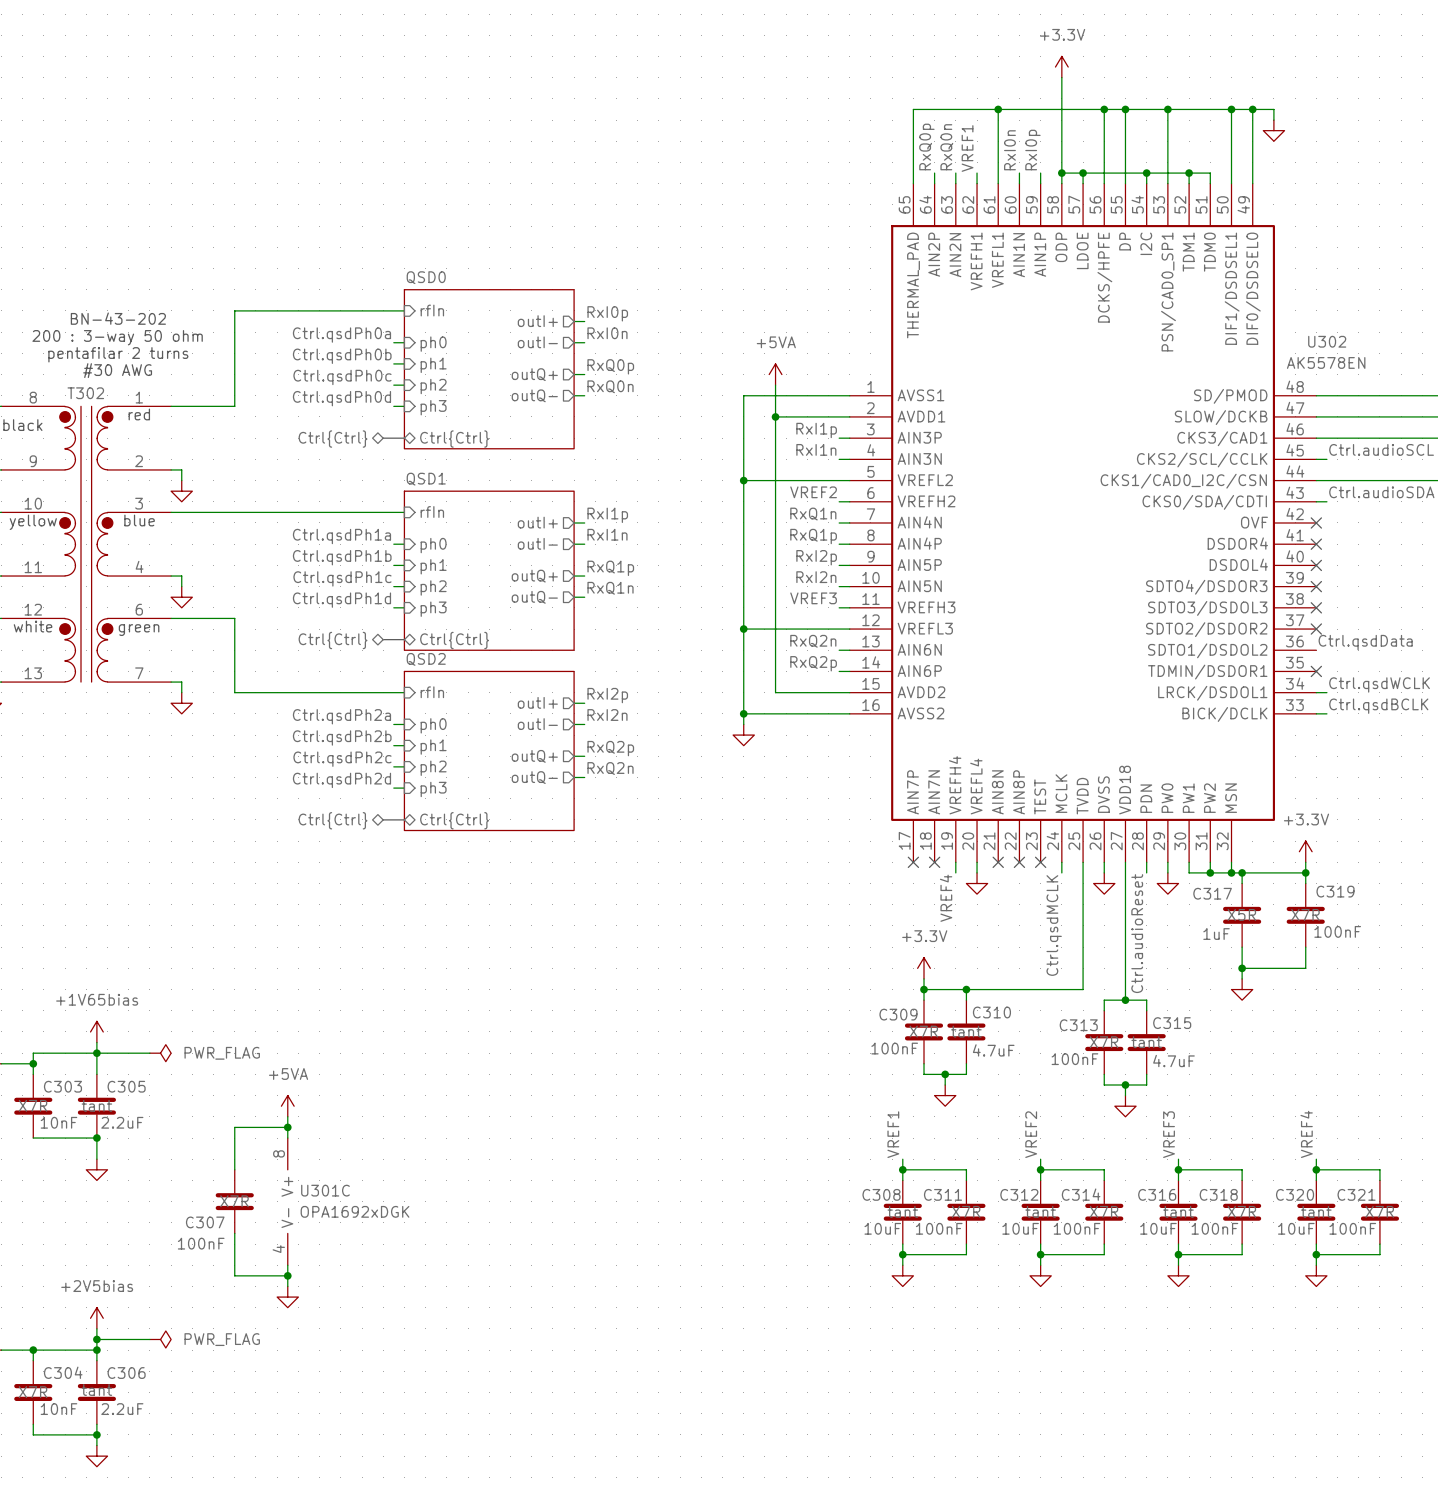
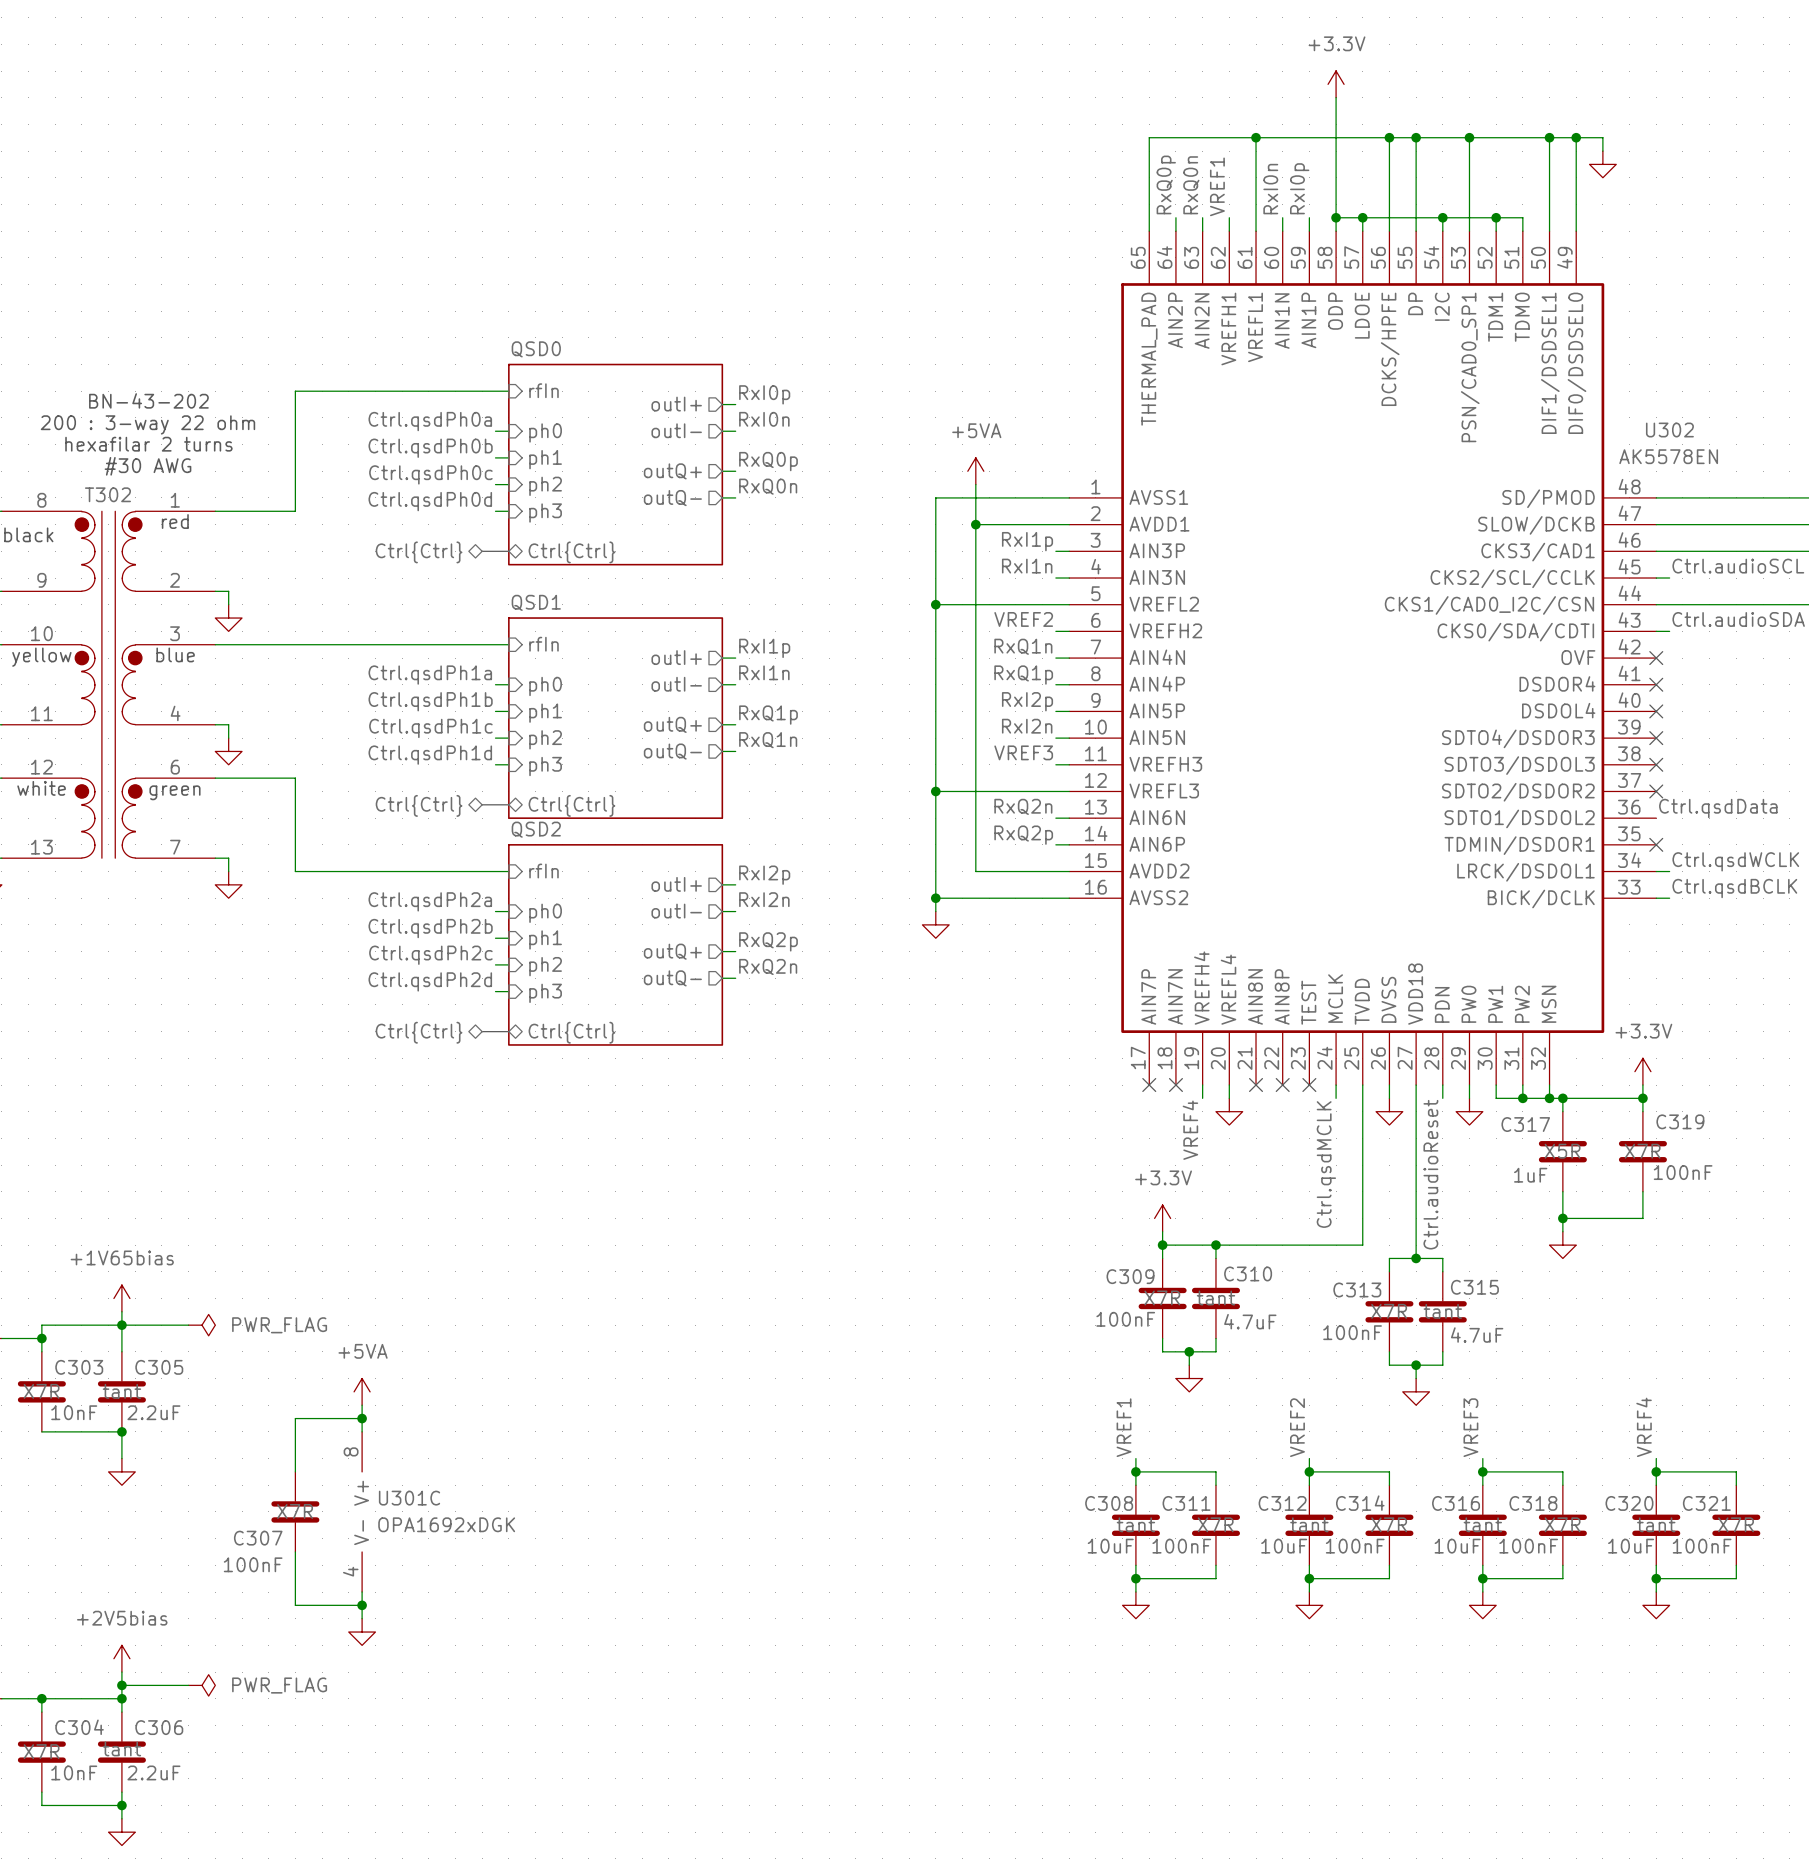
text: 200 : 3-way 50 ohm (117, 337) -> 200 : 3-way 22 ohm (147, 424)
text: pentafilar 2 turns (118, 354) -> hexafilar 2 turns (148, 444)

